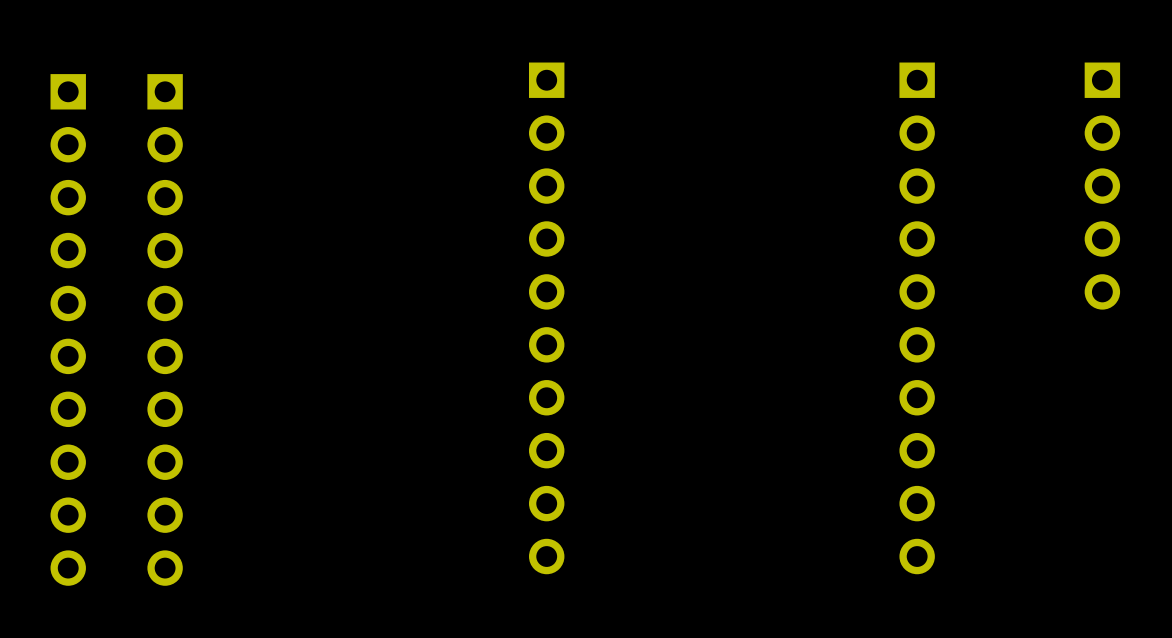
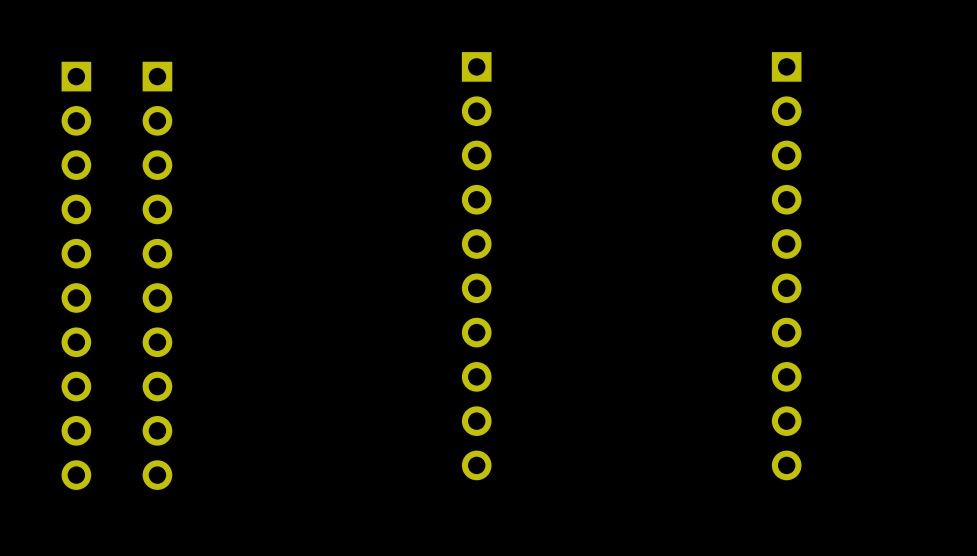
part: (1102, 186) -> none

